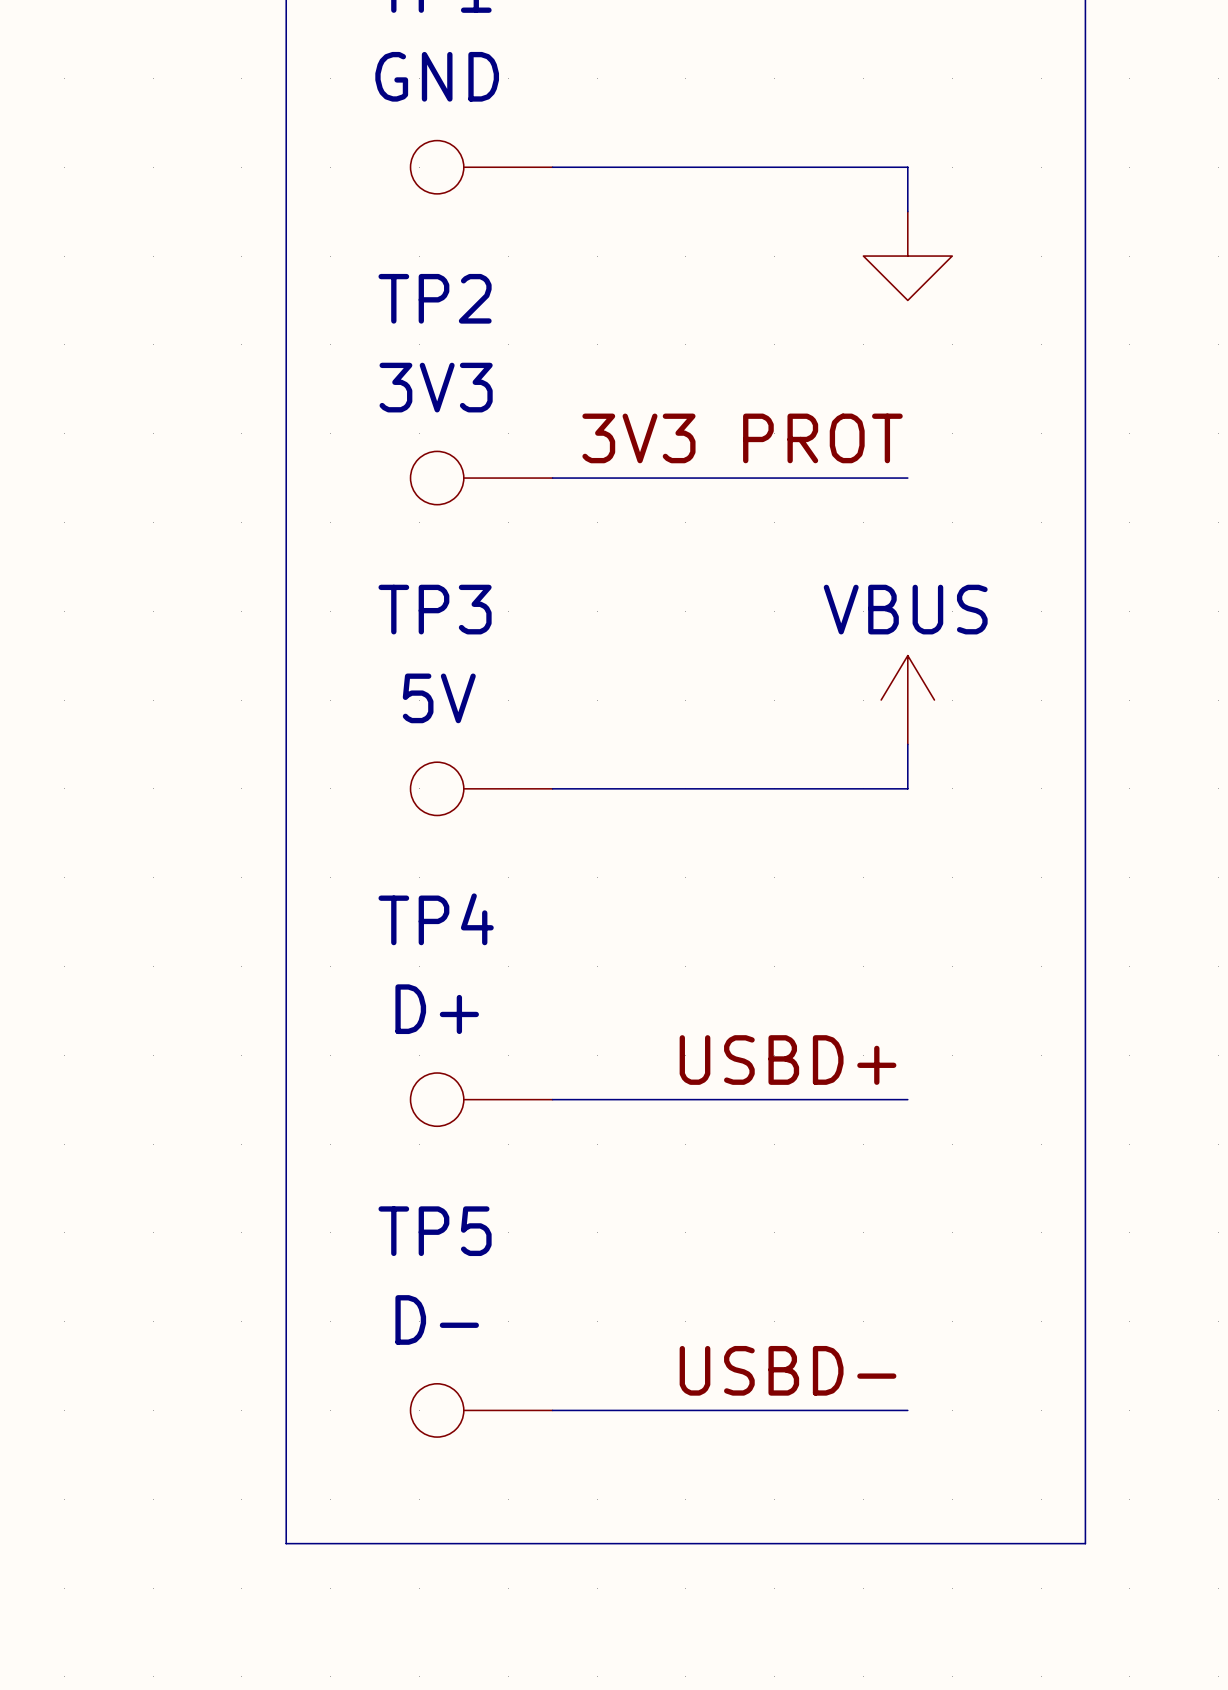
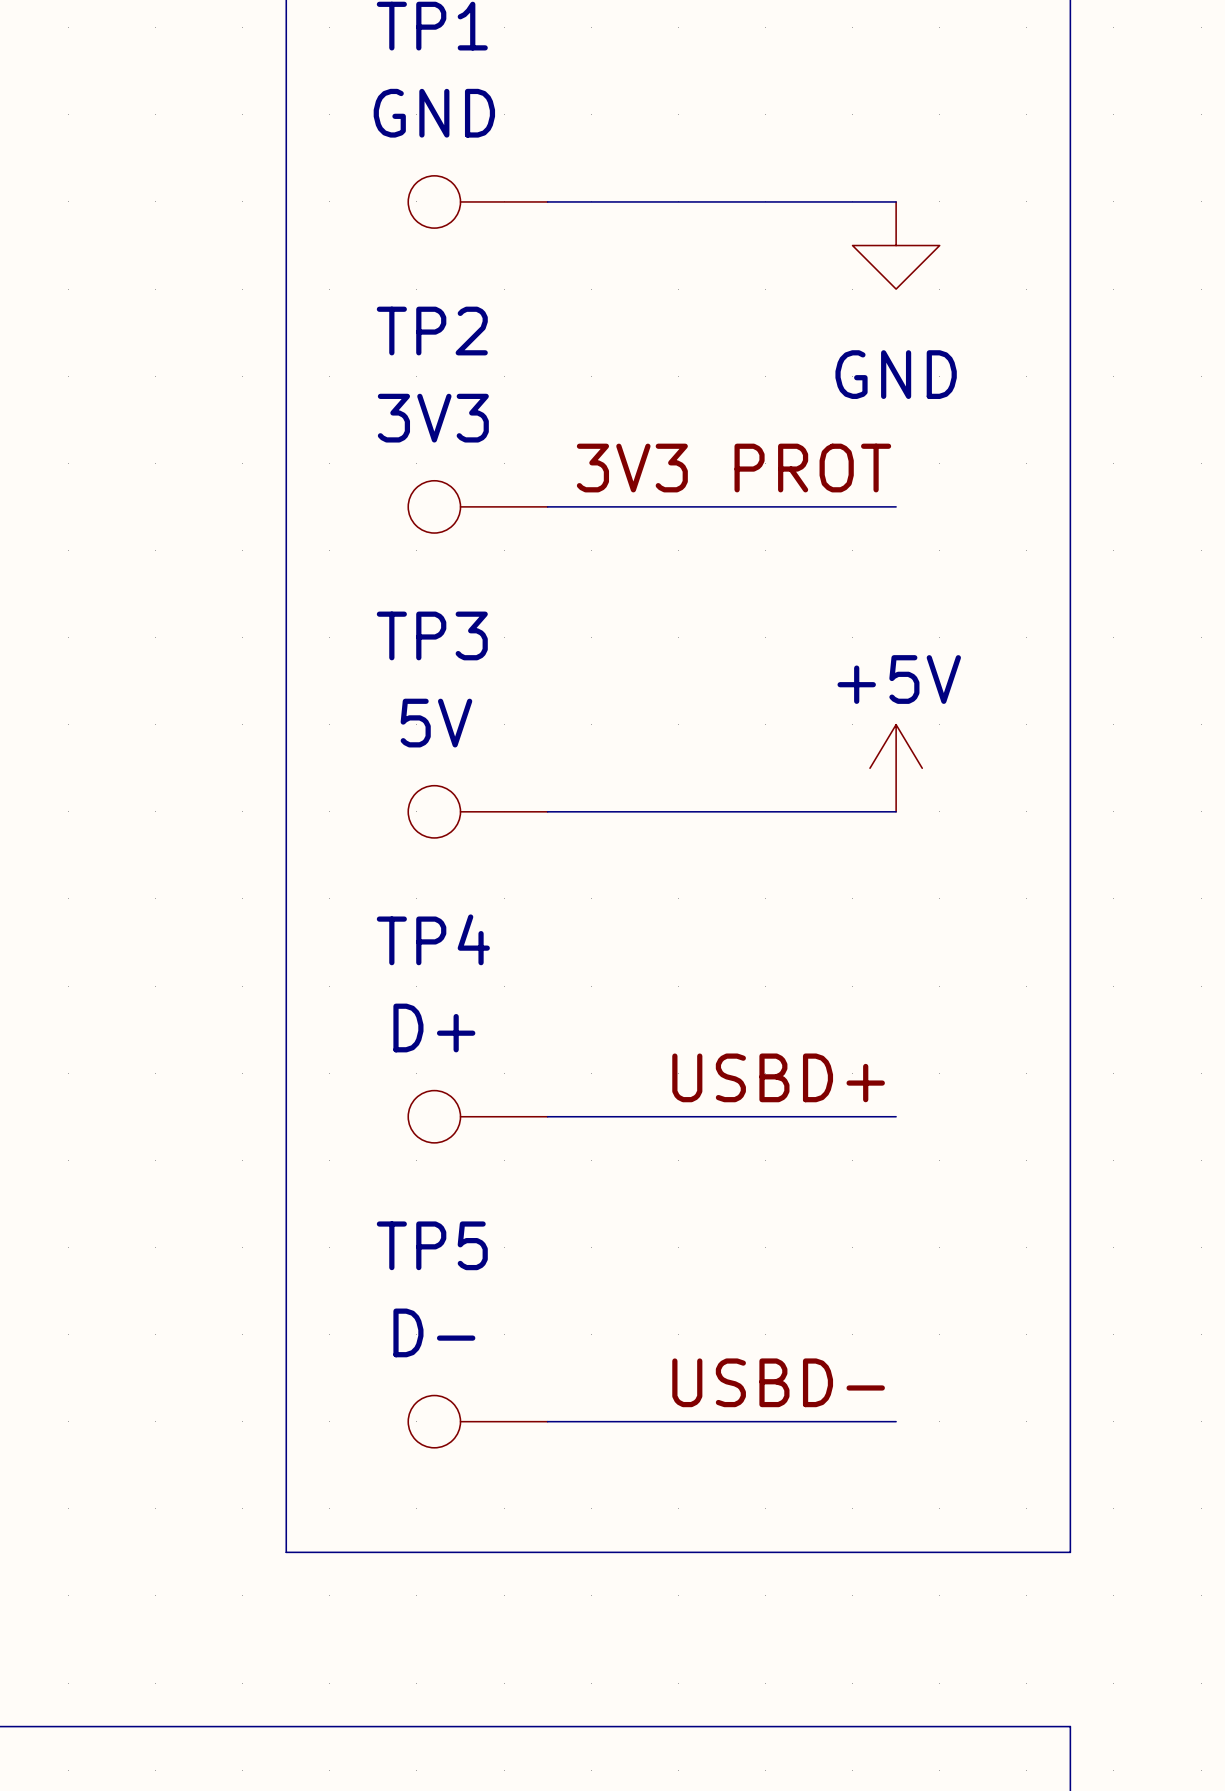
power symbol: none -> GND (896, 245)
power symbol: (907, 256) -> none
power symbol: VBUS (907, 700) -> none
power symbol: none -> +5V (896, 768)

